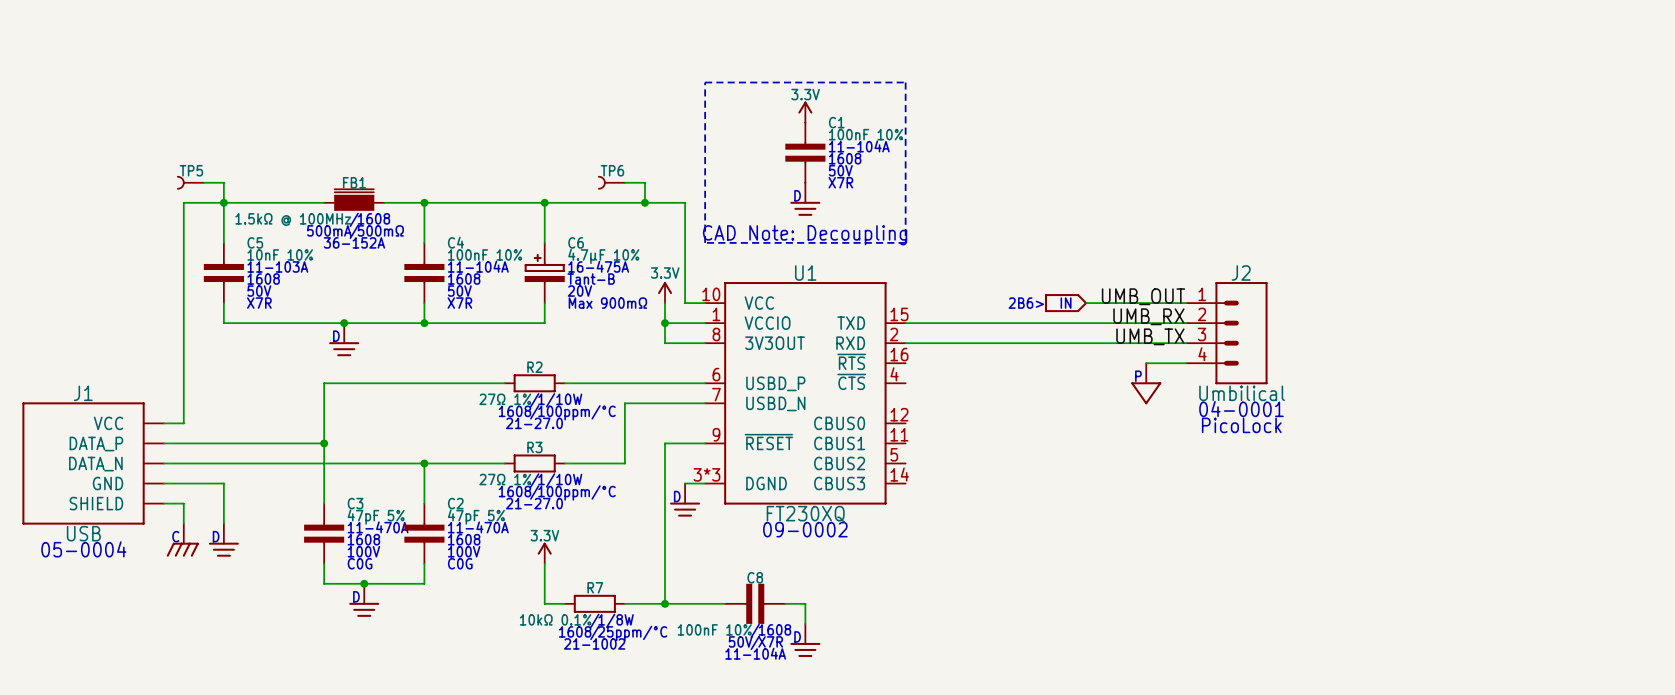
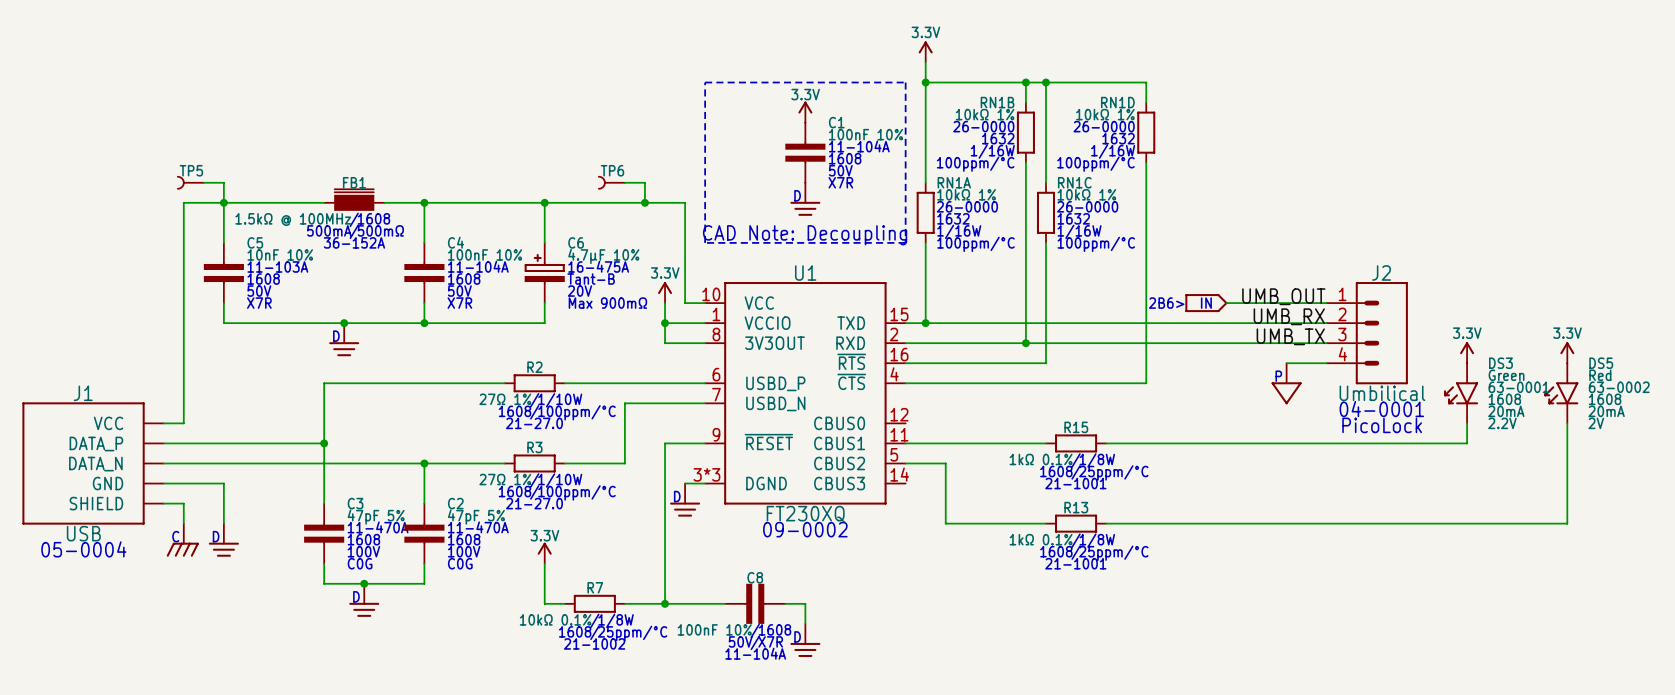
power symbol: none -> 3.3V (925, 51)
wire: none -> (925, 62) (925, 182)
wire: none -> (925, 82) (1146, 82) (1146, 102)
junction: none -> (925, 82)
wire: none -> (1025, 82) (1025, 102)
junction: none -> (1025, 82)
wire: none -> (1045, 82) (1045, 182)
junction: none -> (1045, 82)
RN1B: none -> 10kΩ 1% (1025, 132)
RN1D: none -> 10kΩ 1% (1146, 132)
wire: none -> (1025, 162) (1025, 343)
wire: none -> (1146, 162) (1146, 383) (905, 383)
RN1A: none -> 10kΩ 1% (925, 212)
RN1C: none -> 10kΩ 1% (1045, 212)
wire: none -> (925, 242) (925, 323)
wire: none -> (1045, 242) (1045, 363) (905, 363)
label position: UMB_OUT (1143, 296) -> UMB_OUT (1283, 296)
text position: 2B6> (1026, 303) -> 2B6> (1166, 303)
part position: (1066, 303) -> (1206, 303)
wire: (1086, 303) (1186, 303) -> (1226, 303) (1326, 303)
label position: UMB_RX (1148, 316) -> UMB_RX (1289, 316)
junction: none -> (925, 323)
wire: none -> (1186, 323) (1326, 323)
J2 position: (1226, 333) -> (1367, 333)
label position: UMB_TX (1150, 336) -> UMB_TX (1290, 336)
junction: none -> (1025, 343)
wire: none -> (1186, 343) (1326, 343)
power symbol: none -> 3.3V (1467, 352)
power symbol: none -> 3.3V (1567, 352)
wire: (1146, 363) (1186, 363) -> (1286, 363) (1326, 363)
power symbol position: (1146, 383) -> (1286, 383)
DS3: none -> Green (1461, 393)
DS5: none -> Red (1561, 393)
wire: none -> (1467, 423) (1467, 443) (1106, 443)
wire: none -> (1567, 423) (1567, 523) (1106, 523)
wire: none -> (905, 443) (1045, 443)
R15: none -> 1kΩ 0.1% (1076, 443)
wire: none -> (905, 463) (945, 463) (945, 523) (1045, 523)
R13: none -> 1kΩ 0.1% (1076, 523)

